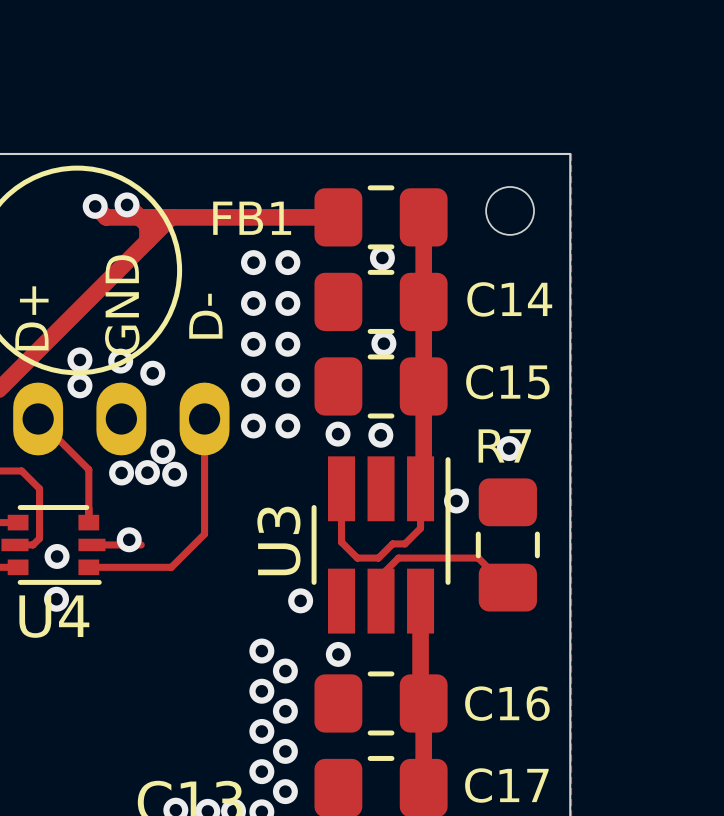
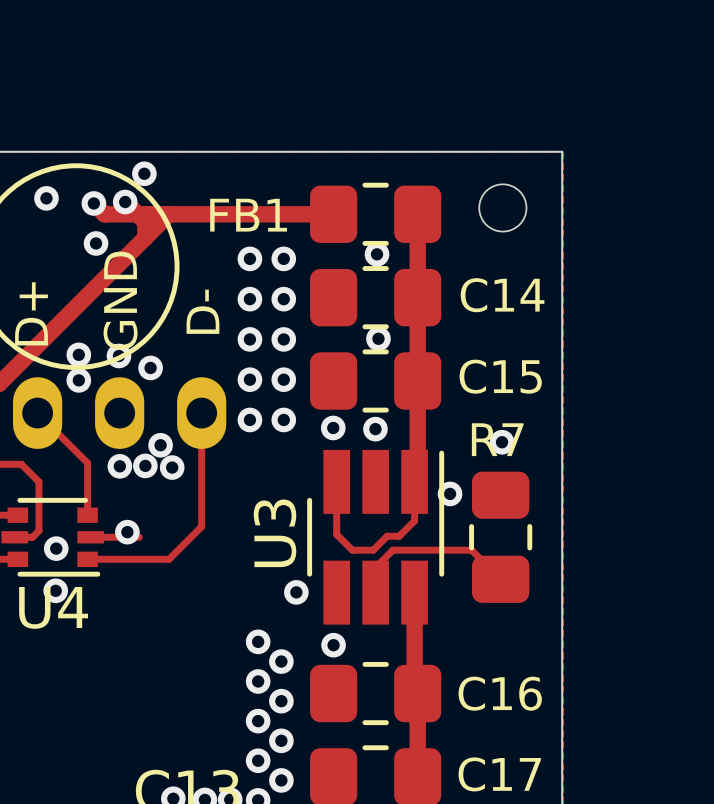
via: none -> (144, 173)
via: none -> (46, 198)
via: none -> (96, 243)

